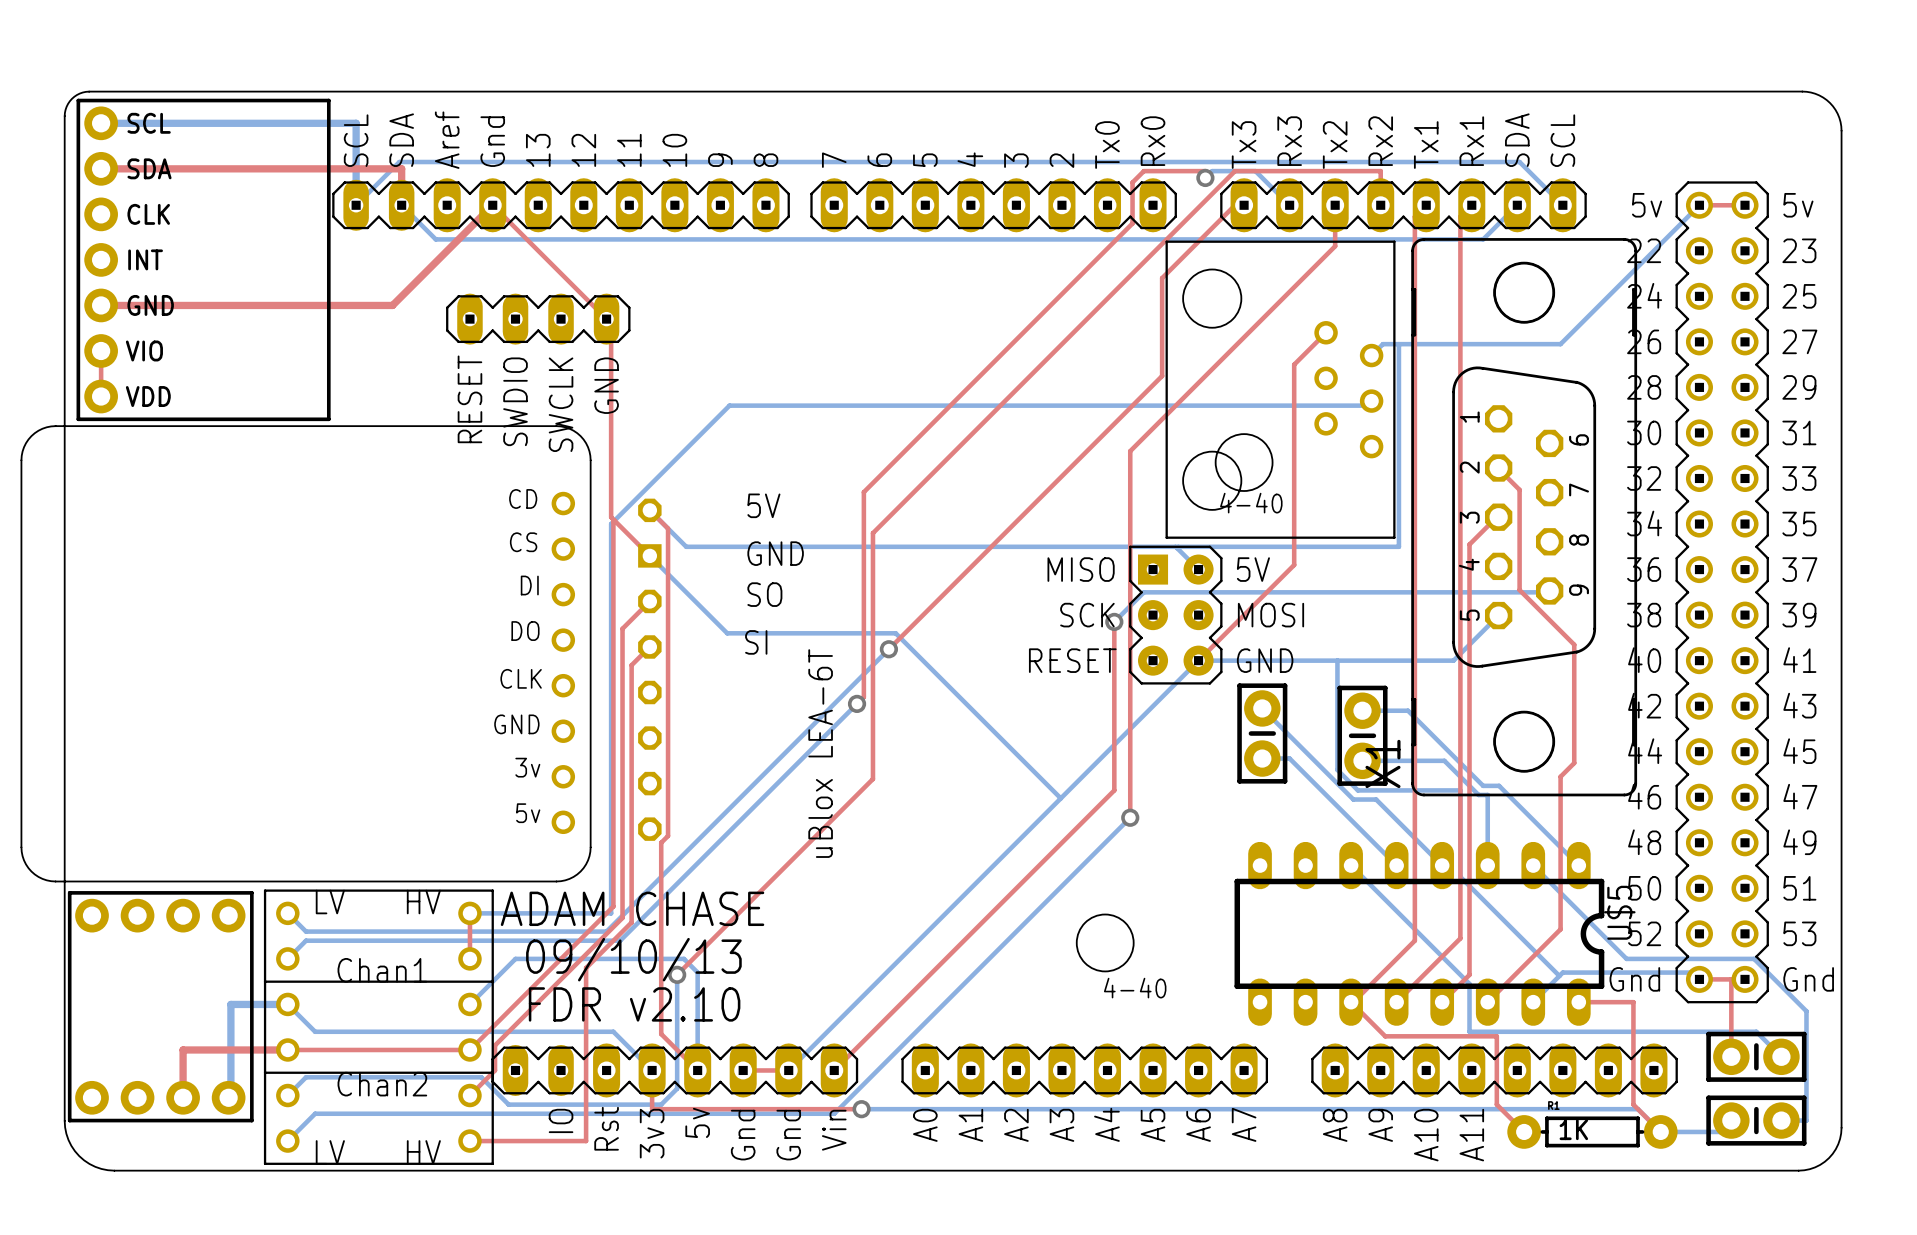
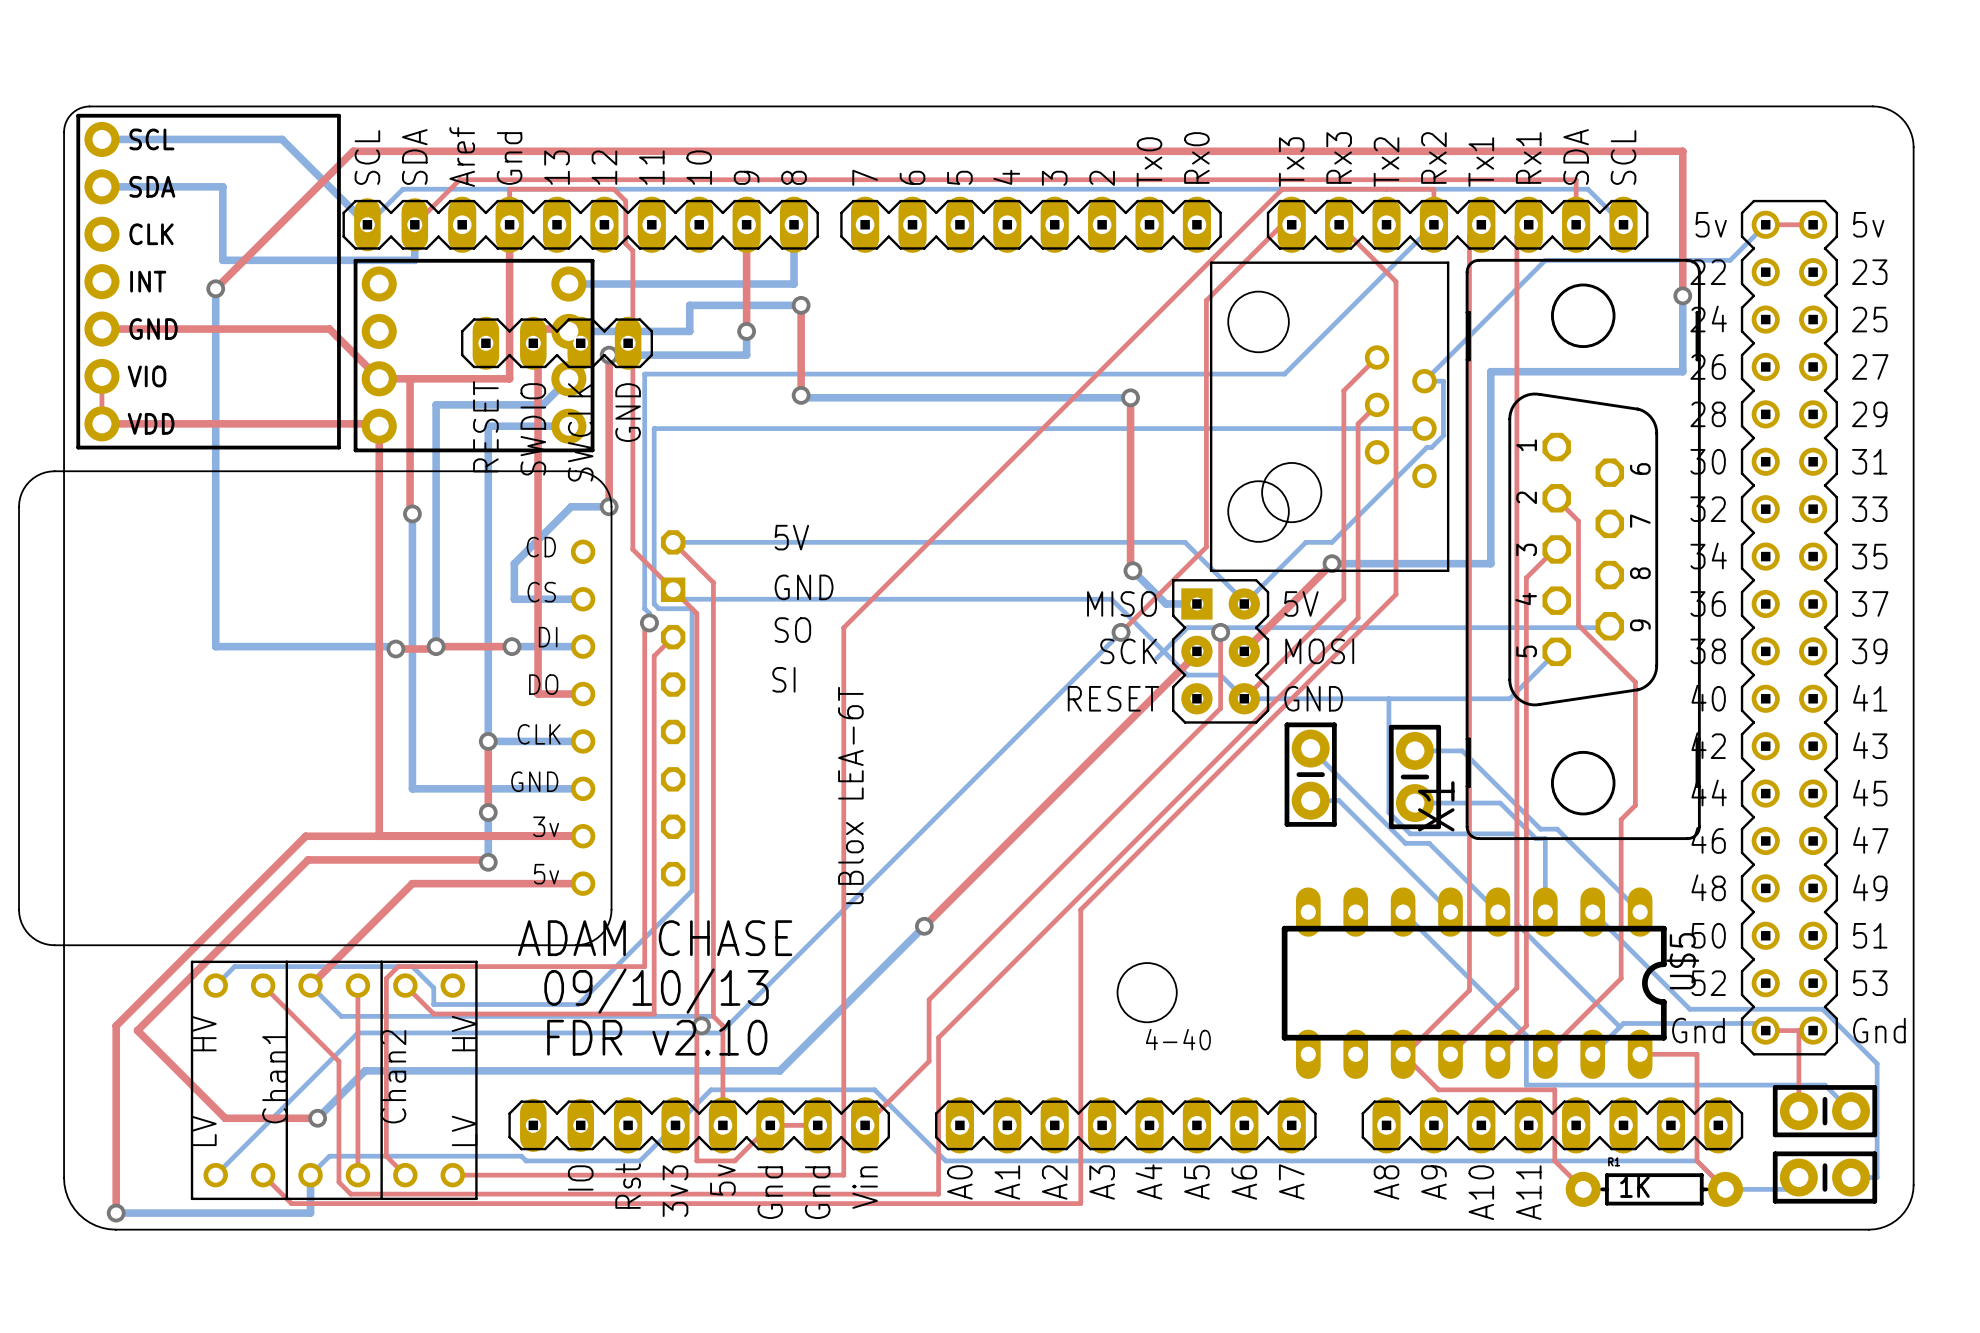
bottom track: (274, 123) (356, 123) (356, 205) -> (282, 139) (367, 224)
top track: (101, 168) (401, 168) (401, 205) -> none
bottom track: none -> (101, 186) (222, 186) (222, 260) (414, 260) (414, 224) (412, 224)
bottom track: (390, 171) (399, 162) (1519, 162) (1528, 171) -> (402, 189) (1258, 189)
bottom track: (1255, 171) (1289, 205) -> (1303, 189) (1587, 189)
top track: (1205, 177) (1205, 171) (1143, 171) (1132, 182) (1132, 223) (863, 492) (863, 697) (857, 703) -> none
via: (1205, 177) -> none
bottom track: (401, 205) (435, 239) (1483, 239) (1517, 205) -> none
top track: none -> (419, 224) (414, 224) (459, 179) (1576, 179) (1576, 224)
top track: none -> (746, 224) (746, 331)
bottom track: none -> (794, 224) (794, 284) (568, 284)
top track: (1335, 205) (1335, 246) (1130, 451) (1130, 817) -> none
bottom track: none -> (1433, 224) (1284, 374) (644, 374) (644, 608) (649, 613) (649, 622)
bottom track: (1665, 239) (1560, 344) (1382, 344) -> (1730, 260) (1545, 260) (1436, 369)
top track: none -> (215, 288) (353, 151) (1682, 151) (1682, 295)
bottom track: none -> (215, 288) (215, 646) (395, 646) (395, 649)
via: none -> (215, 288)
bottom track: none -> (1682, 295) (1682, 371) (1490, 371) (1490, 563) (1332, 563)
via: none -> (1682, 295)
top track: none -> (801, 305) (801, 395)
bottom track: none -> (801, 305) (689, 305) (689, 331) (568, 331)
via: none -> (801, 305)
top track: (319, 305) (392, 305) (492, 205) (611, 323) -> (329, 329) (379, 378) (509, 378) (509, 189) (613, 189) (625, 201) (625, 243) (632, 250) (632, 348)
top track: none -> (568, 331) (568, 329) (538, 329) (538, 694) (583, 694)
bottom track: none -> (746, 331) (746, 355) (609, 355)
via: none -> (746, 331)
part: none -> (474, 355)
top track: none -> (609, 355) (609, 506)
via: none -> (609, 355)
bottom track: (1398, 344) (1398, 546) (1176, 547) -> none
top track: none -> (410, 378) (410, 513) (412, 513)
bottom track: none -> (568, 378) (542, 404) (436, 404) (436, 646)
bottom track: none -> (801, 395) (801, 397) (1130, 397)
via: none -> (801, 395)
top track: none -> (1130, 397) (1130, 570) (1132, 570)
via: none -> (1130, 397)
top track: (1162, 376) (888, 649) -> (1206, 402) (1206, 547) (1121, 632)
top track: none -> (1377, 404) (1358, 423) (1358, 618) (938, 1037) (938, 1194) (350, 1194) (338, 1182) (338, 1061) (263, 985)
top track: none -> (101, 423) (379, 423) (379, 836)
bottom track: none -> (568, 426) (488, 426) (488, 741) (583, 741)
bottom track: (1371, 401) (1367, 405) (729, 405) (611, 524) (611, 913) (469, 913) -> (1424, 428) (654, 428) (654, 603) (658, 608) (692, 608) (692, 890) (578, 1004) (433, 1004) (433, 987) (412, 966) (234, 966) (215, 985)
bottom track: none -> (609, 506) (571, 506) (514, 563) (514, 599) (583, 599)
via: none -> (609, 506)
bottom track: none -> (412, 513) (412, 788) (583, 788)
via: none -> (412, 513)
text: 4-40 (1251, 503) -> none
bottom track: (649, 510) (686, 546) (1175, 546) (1198, 569) -> (673, 542) (1185, 542) (1244, 601) (1244, 603) (1305, 542) (1332, 542) (1426, 447) (1431, 447) (1443, 435) (1443, 381) (1424, 381)
top track: (614, 520) (613, 906) (469, 1049) (183, 1049) (183, 1097) -> none
top track: (668, 528) (668, 835) (661, 842) (661, 1034) (697, 1070) -> (692, 561) (713, 582) (713, 1016) (722, 1025) (722, 1125)
top track: none -> (1332, 563) (1244, 651)
via: none -> (1332, 563)
top track: (872, 533) (872, 779) (677, 974) -> (905, 566) (843, 627) (843, 1175) (452, 1175)
bottom track: none -> (1132, 570) (1166, 603) (1196, 603)
via: none -> (1132, 570)
top track: none -> (673, 589) (696, 613) (696, 1160) (734, 1160) (770, 1125)
bottom track: (658, 565) (727, 633) (895, 633) (1060, 798) -> (682, 599) (1111, 599) (1187, 675) (1220, 675) (1244, 698)
via: none -> (649, 622)
bottom track: none -> (1121, 632) (720, 1032) (357, 1032) (215, 1175)
via: none -> (1121, 632)
via: none -> (1220, 632)
via: none -> (436, 646)
top track: none -> (511, 646) (436, 646) (436, 649) (395, 649)
bottom track: none -> (511, 646) (583, 646)
via: none -> (511, 646)
via: none -> (395, 649)
top track: none -> (1196, 651) (1196, 653) (924, 926)
top track: (631, 619) (622, 628) -> (649, 622) (644, 627) (644, 665)
top track: (1114, 621) (1114, 790) -> (1339, 224) (1396, 281) (1396, 594) (1156, 833)
via: (1114, 621) -> none
top track: (649, 646) (631, 665) -> (654, 656) (654, 703)
bottom track: (888, 649) (606, 931) (306, 931) (287, 913) -> none
via: (888, 649) -> none
part position: (306, 653) -> (315, 708)
bottom track: (1198, 660) (788, 1070) -> none
top track: none -> (488, 741) (488, 812)
via: none -> (488, 741)
bottom track: (857, 703) (620, 940) (306, 940) (287, 958) -> none
via: (857, 703) -> none
bottom track: none -> (488, 812) (488, 862)
via: none -> (488, 812)
top track: none -> (583, 836) (305, 836) (116, 1025) (116, 1213)
top track: none -> (488, 862) (485, 859) (308, 859) (137, 1030) (225, 1118) (317, 1118)
via: none -> (488, 862)
bottom track: (1130, 817) (834, 1113) (315, 1113) (287, 1141) -> none
via: (1130, 817) -> none
top track: none -> (583, 883) (412, 883) (310, 985)
top track: (1041, 863) (895, 1009) -> (1220, 632) (1220, 708) (929, 999) (929, 1061)
top track: none -> (1080, 909) (1080, 1203) (291, 1203) (263, 1175)
bottom track: none -> (924, 926) (779, 1070) (365, 1070) (317, 1118)
via: none -> (924, 926)
text position: ADAM CHASE (632, 908) -> ADAM CHASE (655, 938)
top track: (469, 913) (469, 958) -> none
top track: (622, 917) (495, 1045) (495, 1070) (469, 1095) -> (644, 966) (398, 966) (386, 978) (386, 1156) (405, 1175)
top track: (631, 922) (586, 968) (586, 1141) (469, 1141) -> (654, 971) (654, 1013) (433, 1013) (405, 985)
bottom track: none -> (310, 985) (341, 1016) (713, 1016)
top track: none -> (357, 985) (357, 1175)
text position: 09/10/13 (633, 959) -> 09/10/13 (656, 991)
bottom track: (677, 974) (677, 1088) (661, 1104) (617, 1104) -> none
bottom track: (469, 1004) (515, 958) (683, 958) (697, 972) (697, 1070) -> none
text position: FDR v2.10 (634, 1004) -> FDR v2.10 (657, 1037)
part: (160, 1006) -> none
part rotation: 0° (378, 1027) -> 90° counterclockwise (334, 1080)
via: none -> (317, 1118)
top track: (652, 1070) (652, 1109) (861, 1109) -> none
bottom track: (652, 1070) (613, 1031) (315, 1031) (287, 1004) (230, 1004) (230, 1097) (228, 1097) -> none
bottom track: (287, 1095) (306, 1077) (481, 1077) (504, 1100) -> (116, 1213) (310, 1213) (310, 1175) (329, 1156) (521, 1156)
bottom track: (861, 1109) (1637, 1109) -> (639, 1160) (711, 1089) (874, 1089) (945, 1160) (1697, 1160) (1701, 1165)
via: (861, 1109) -> none
via: none -> (116, 1213)

